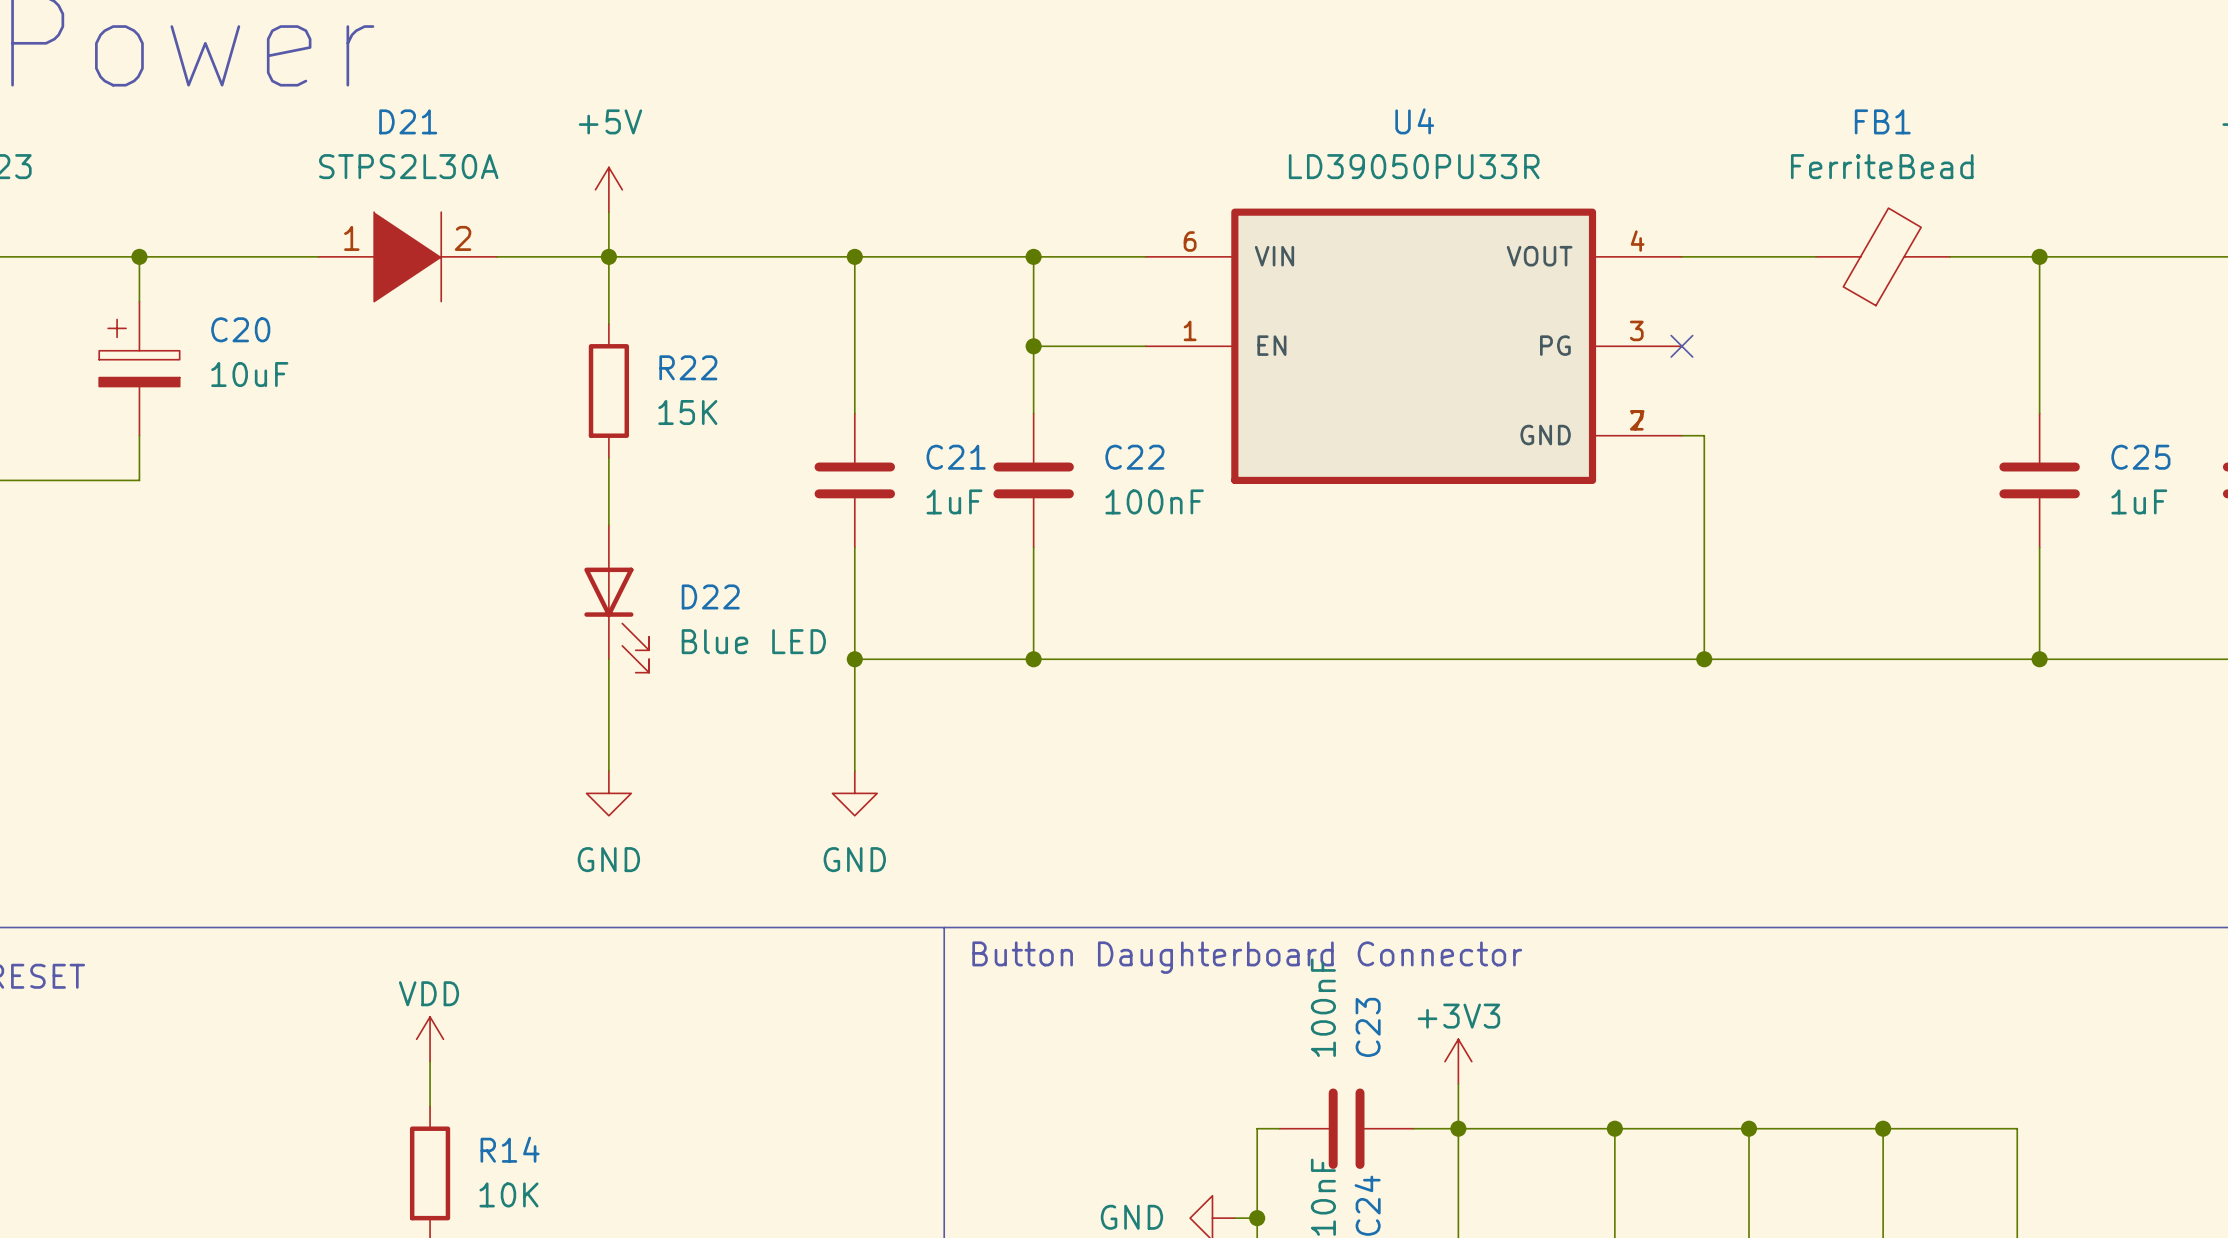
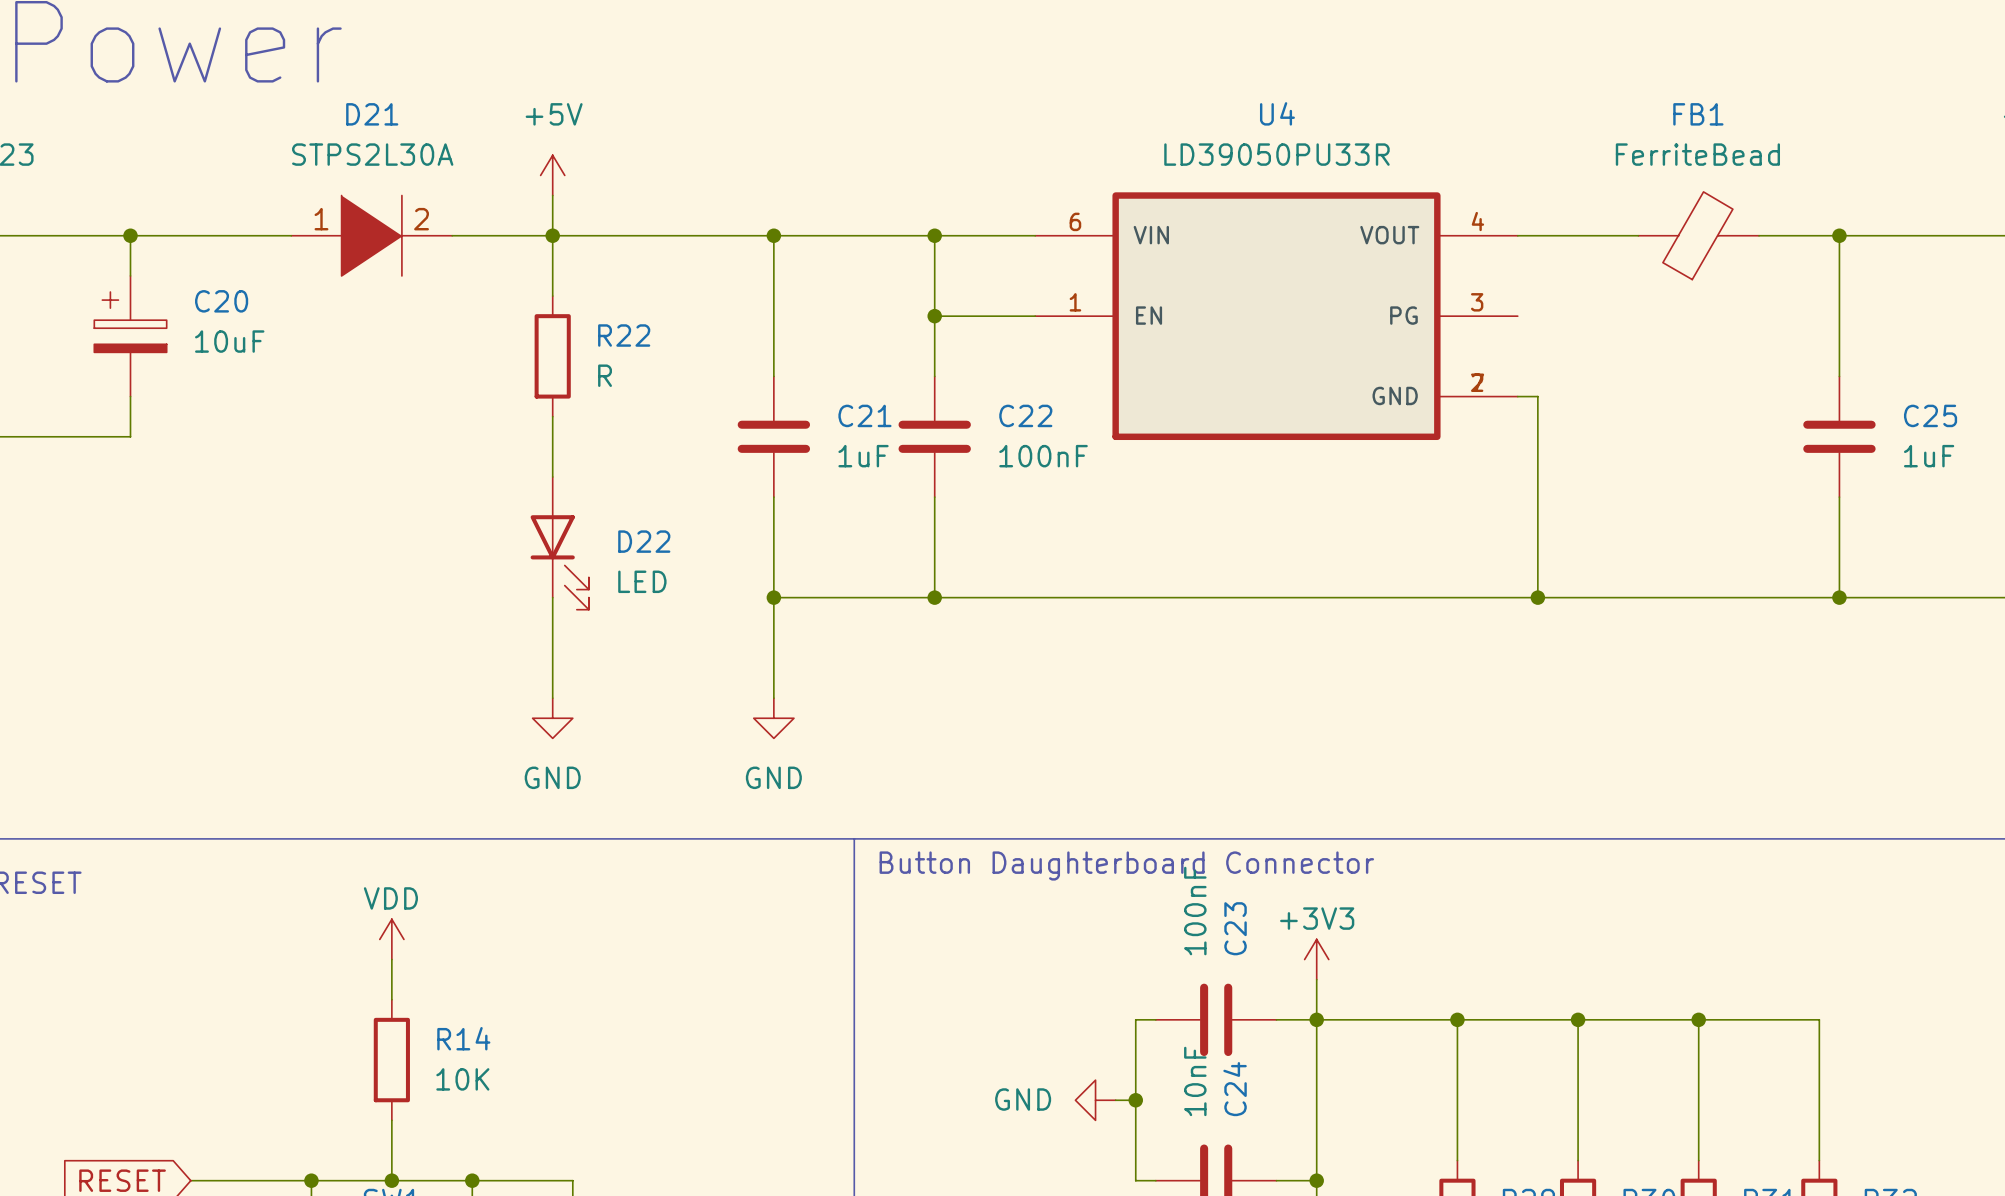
no-connect mark: (1681, 346) -> none
R22 value: 15K (687, 412) -> R (605, 375)
D22 value: Blue LED (753, 641) -> LED (642, 581)

